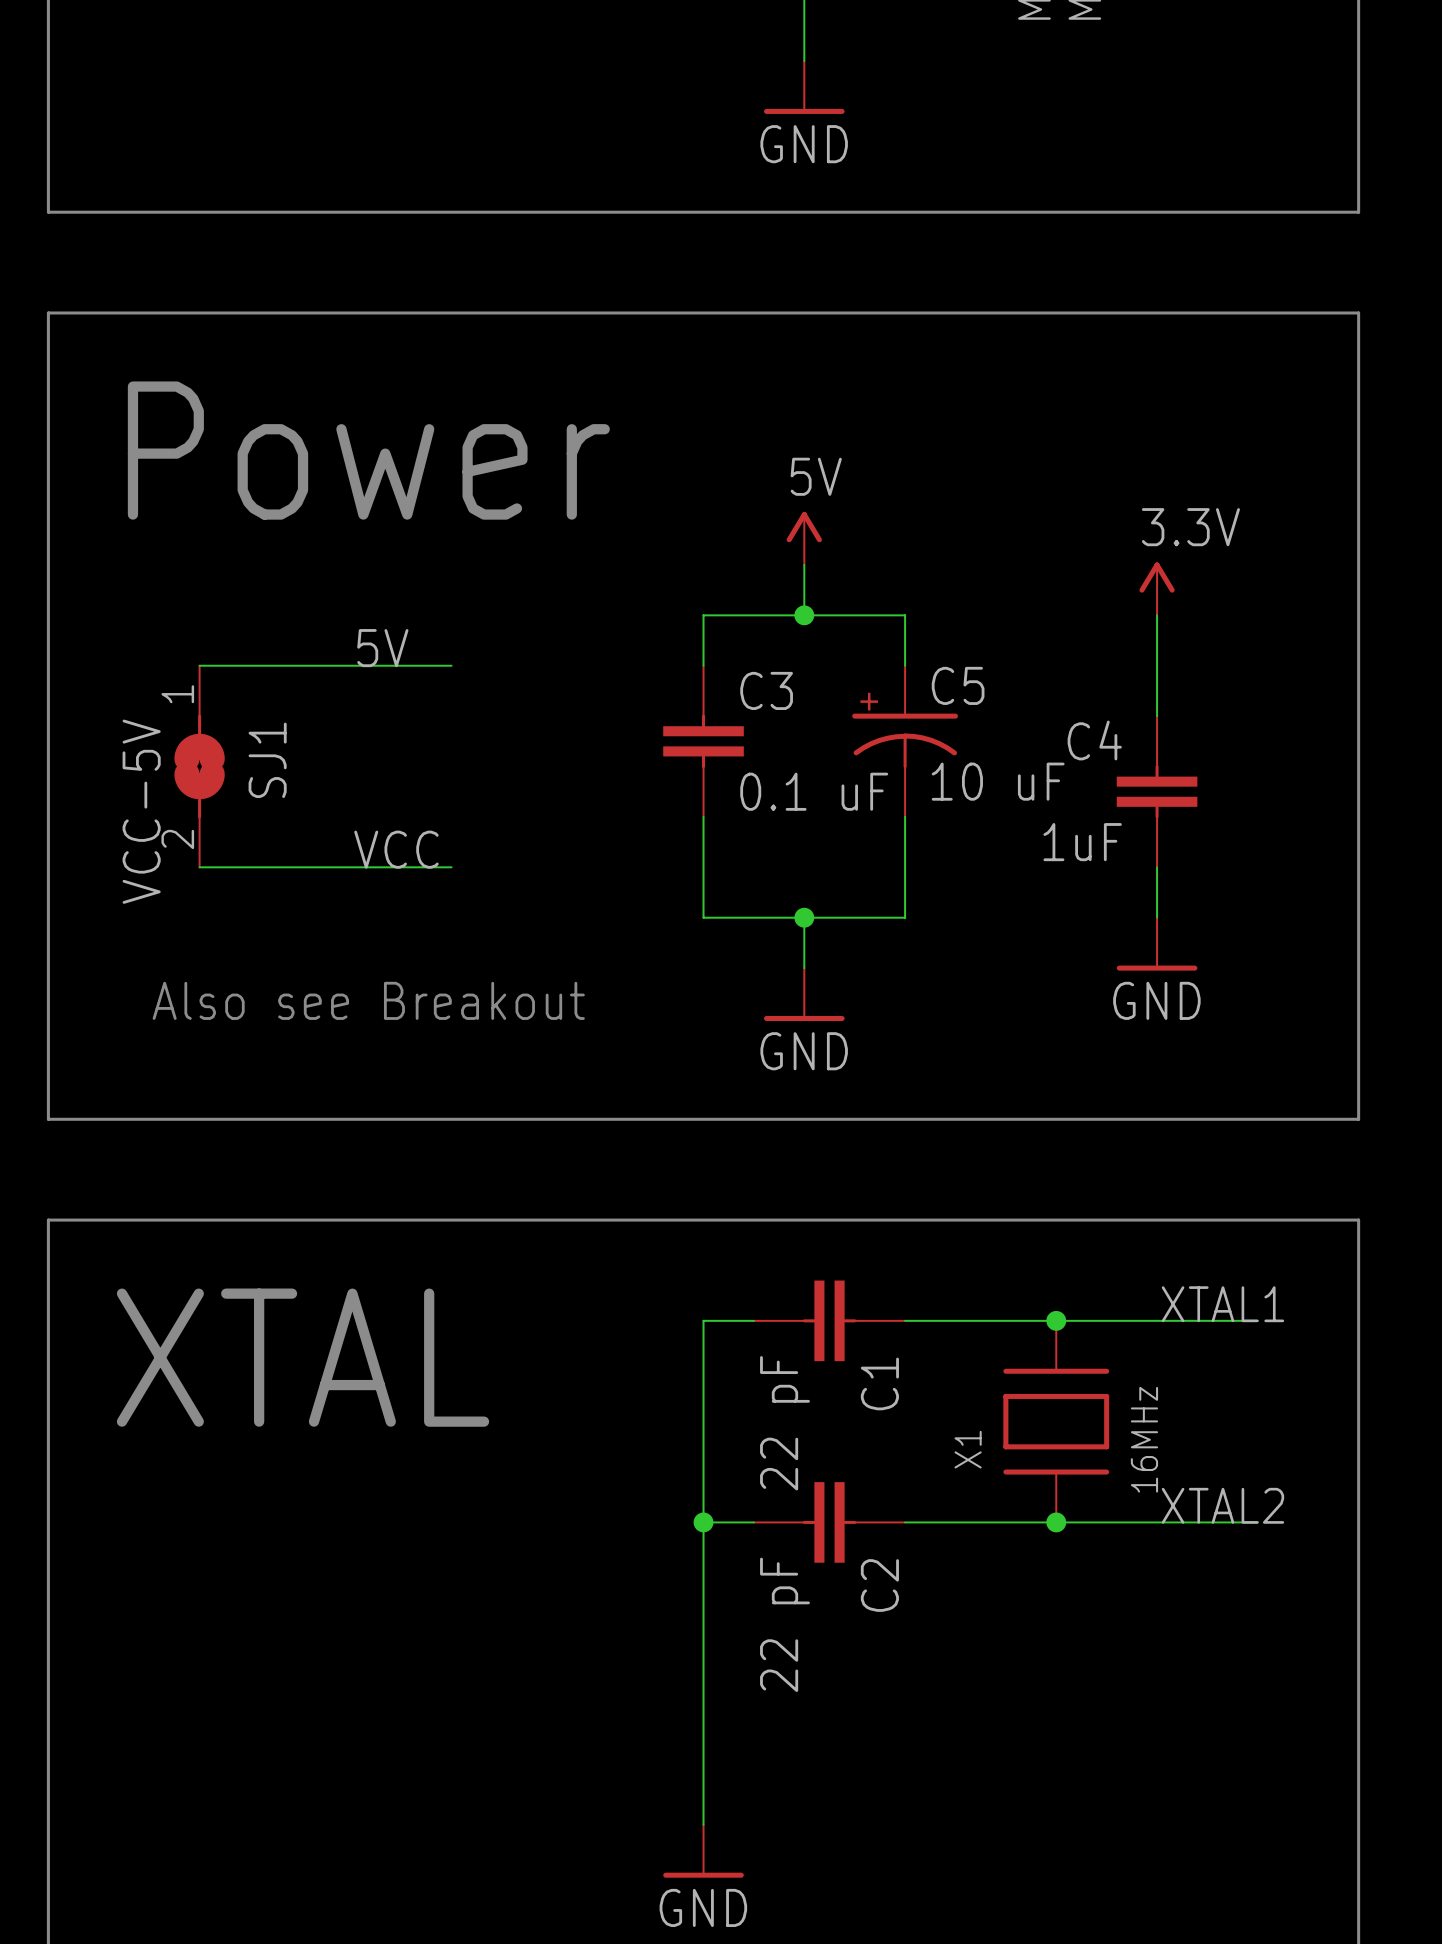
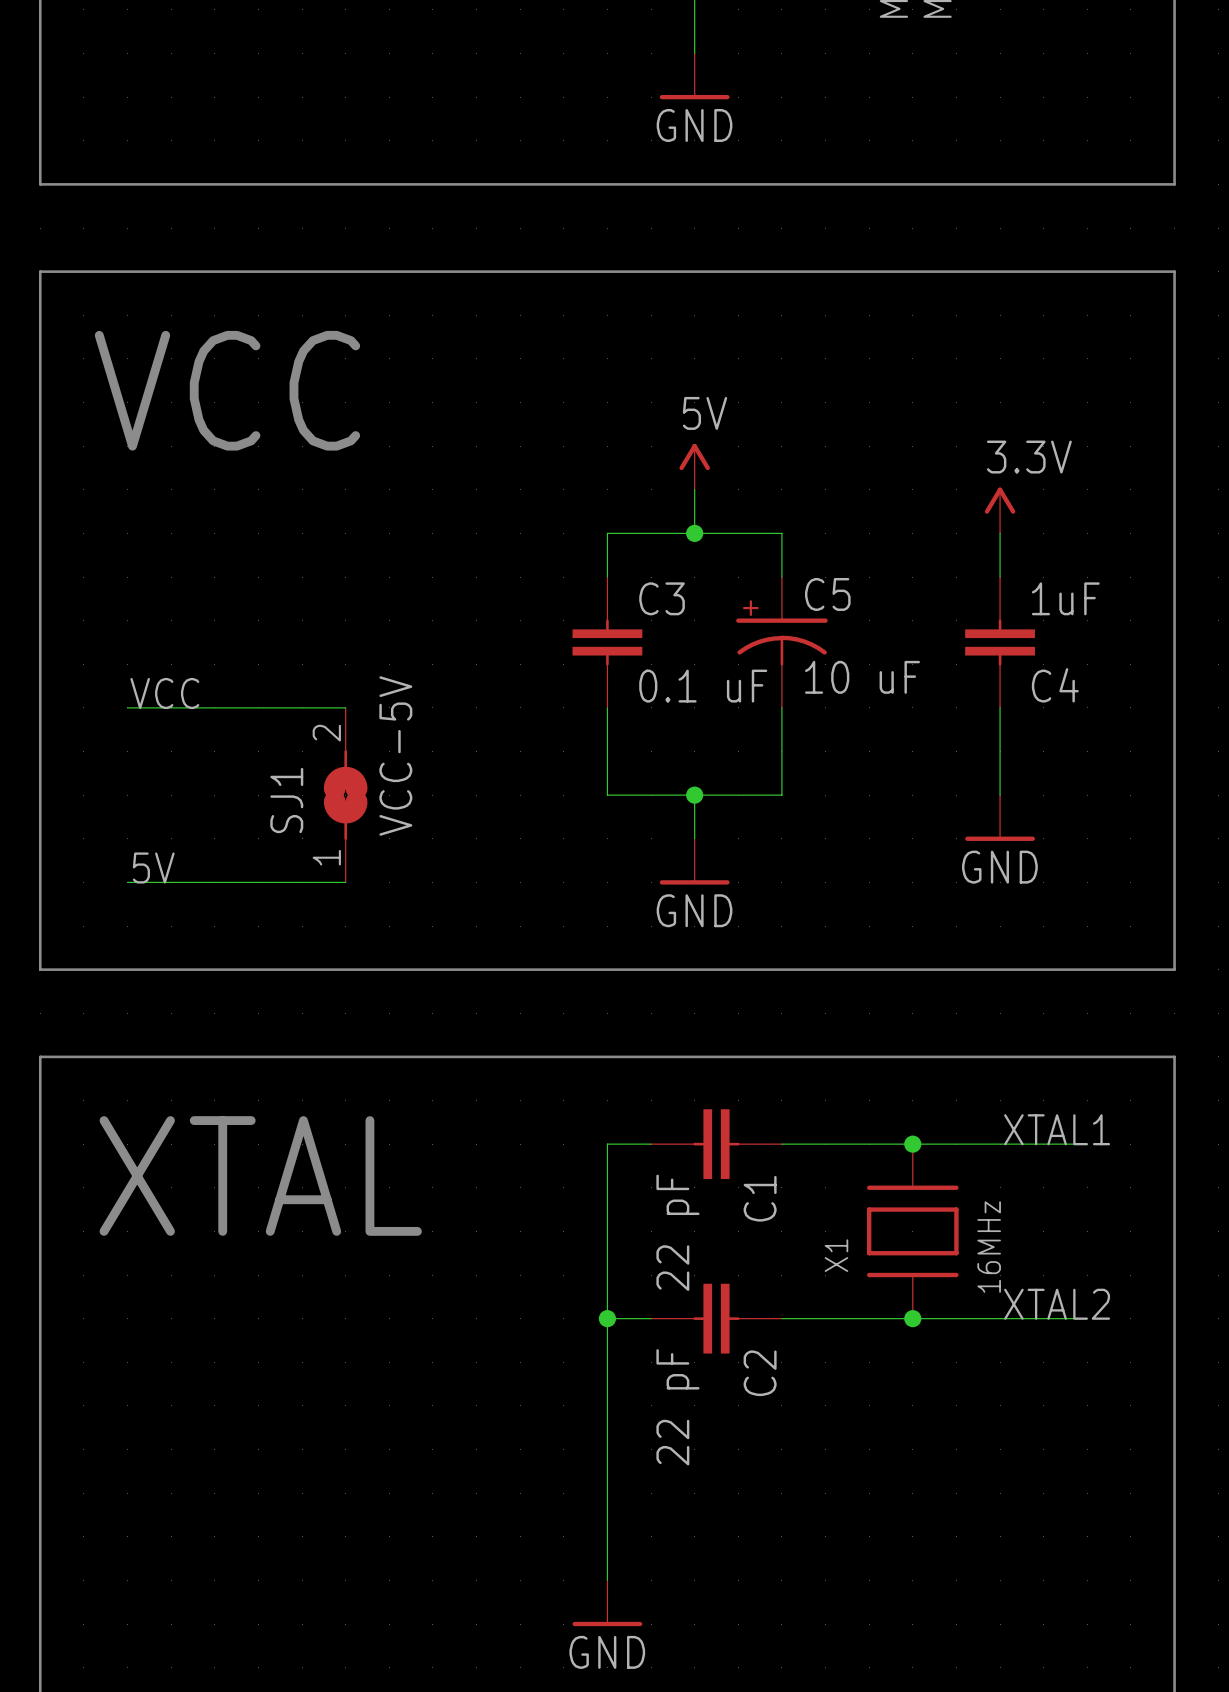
text: Power (368, 450) -> VCC (227, 390)
label position: 5V (382, 648) -> 5V (153, 867)
wire: (199, 665) (451, 665) -> (127, 882) (345, 882)
C4 name position: C4 (1094, 740) -> C4 (1055, 685)
SJ1 rotation: 0° (199, 766) -> 180° (345, 795)
SJ1 position: (199, 766) -> (345, 795)
C4 position: (1157, 791) -> (1000, 642)
C4 value position: 1uF (1082, 842) -> 1uF (1065, 598)
label position: VCC (396, 849) -> VCC (164, 693)
wire: (199, 867) (451, 867) -> (127, 707) (345, 707)
text: Also see Breakout (368, 1000) -> none

